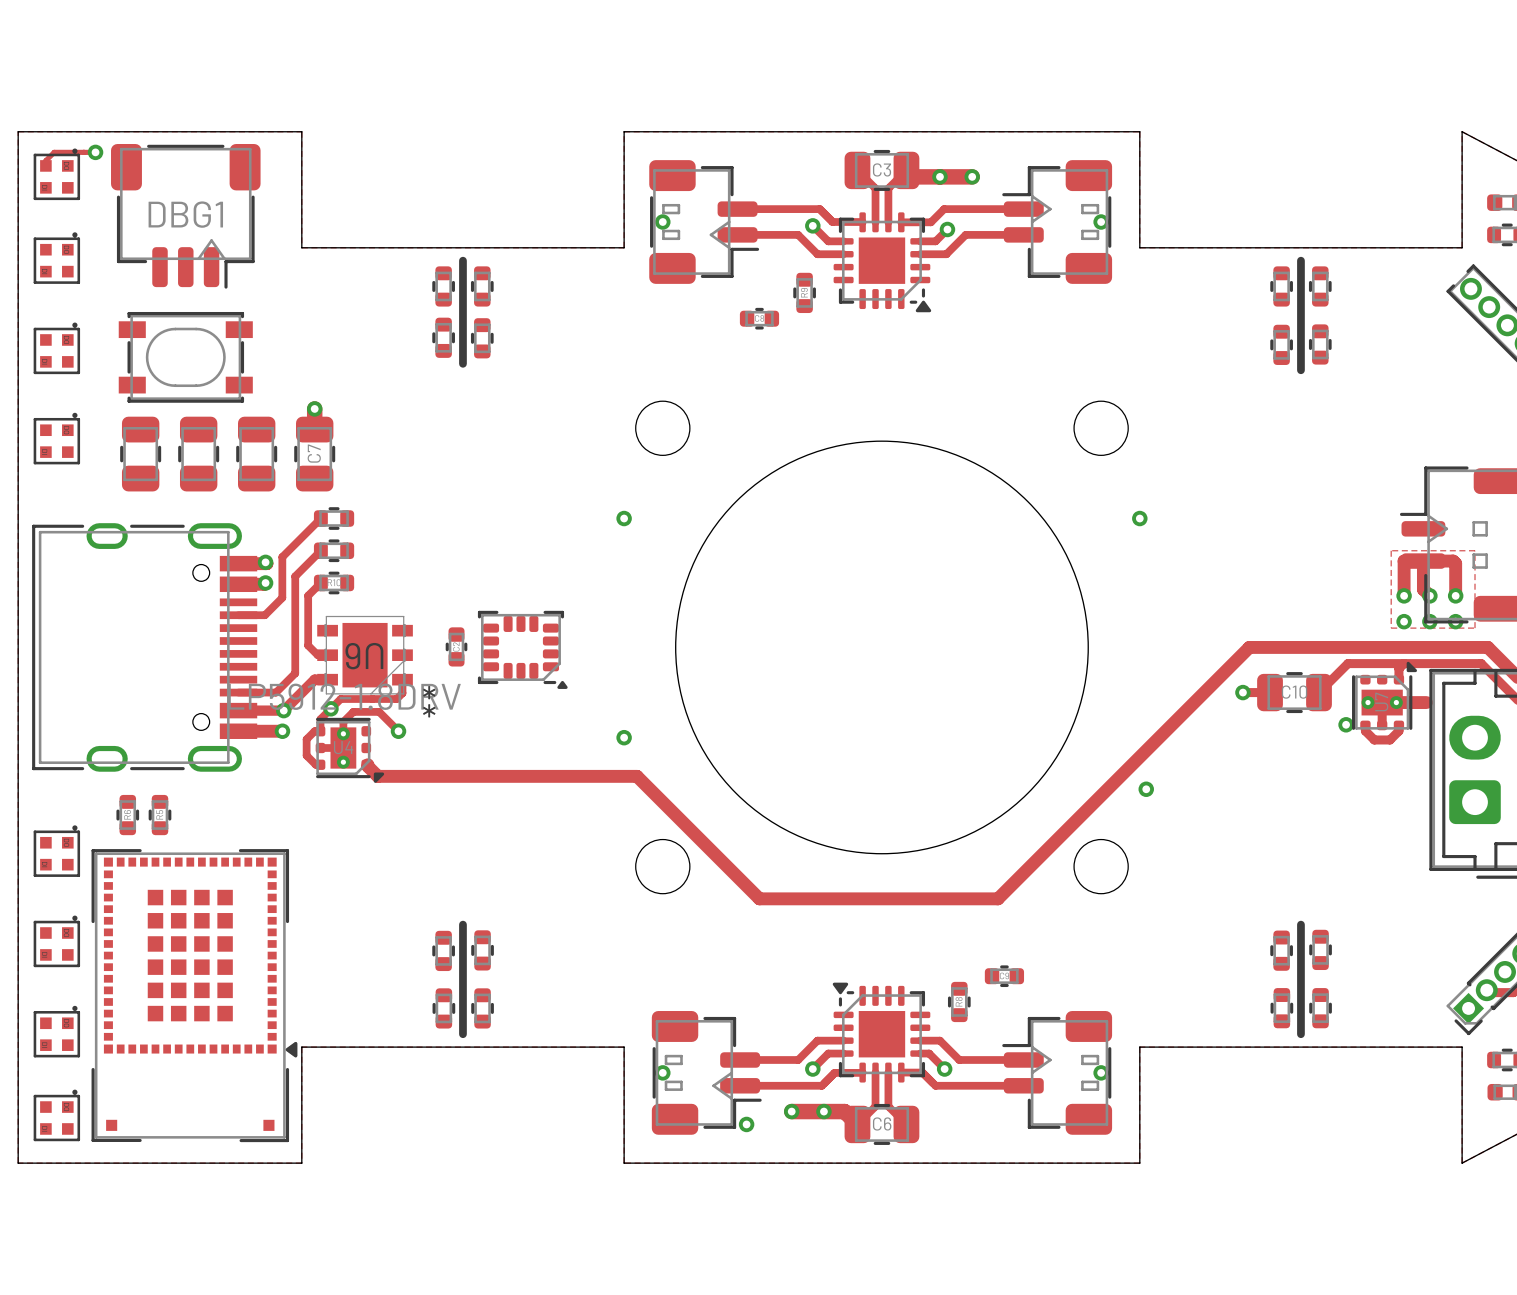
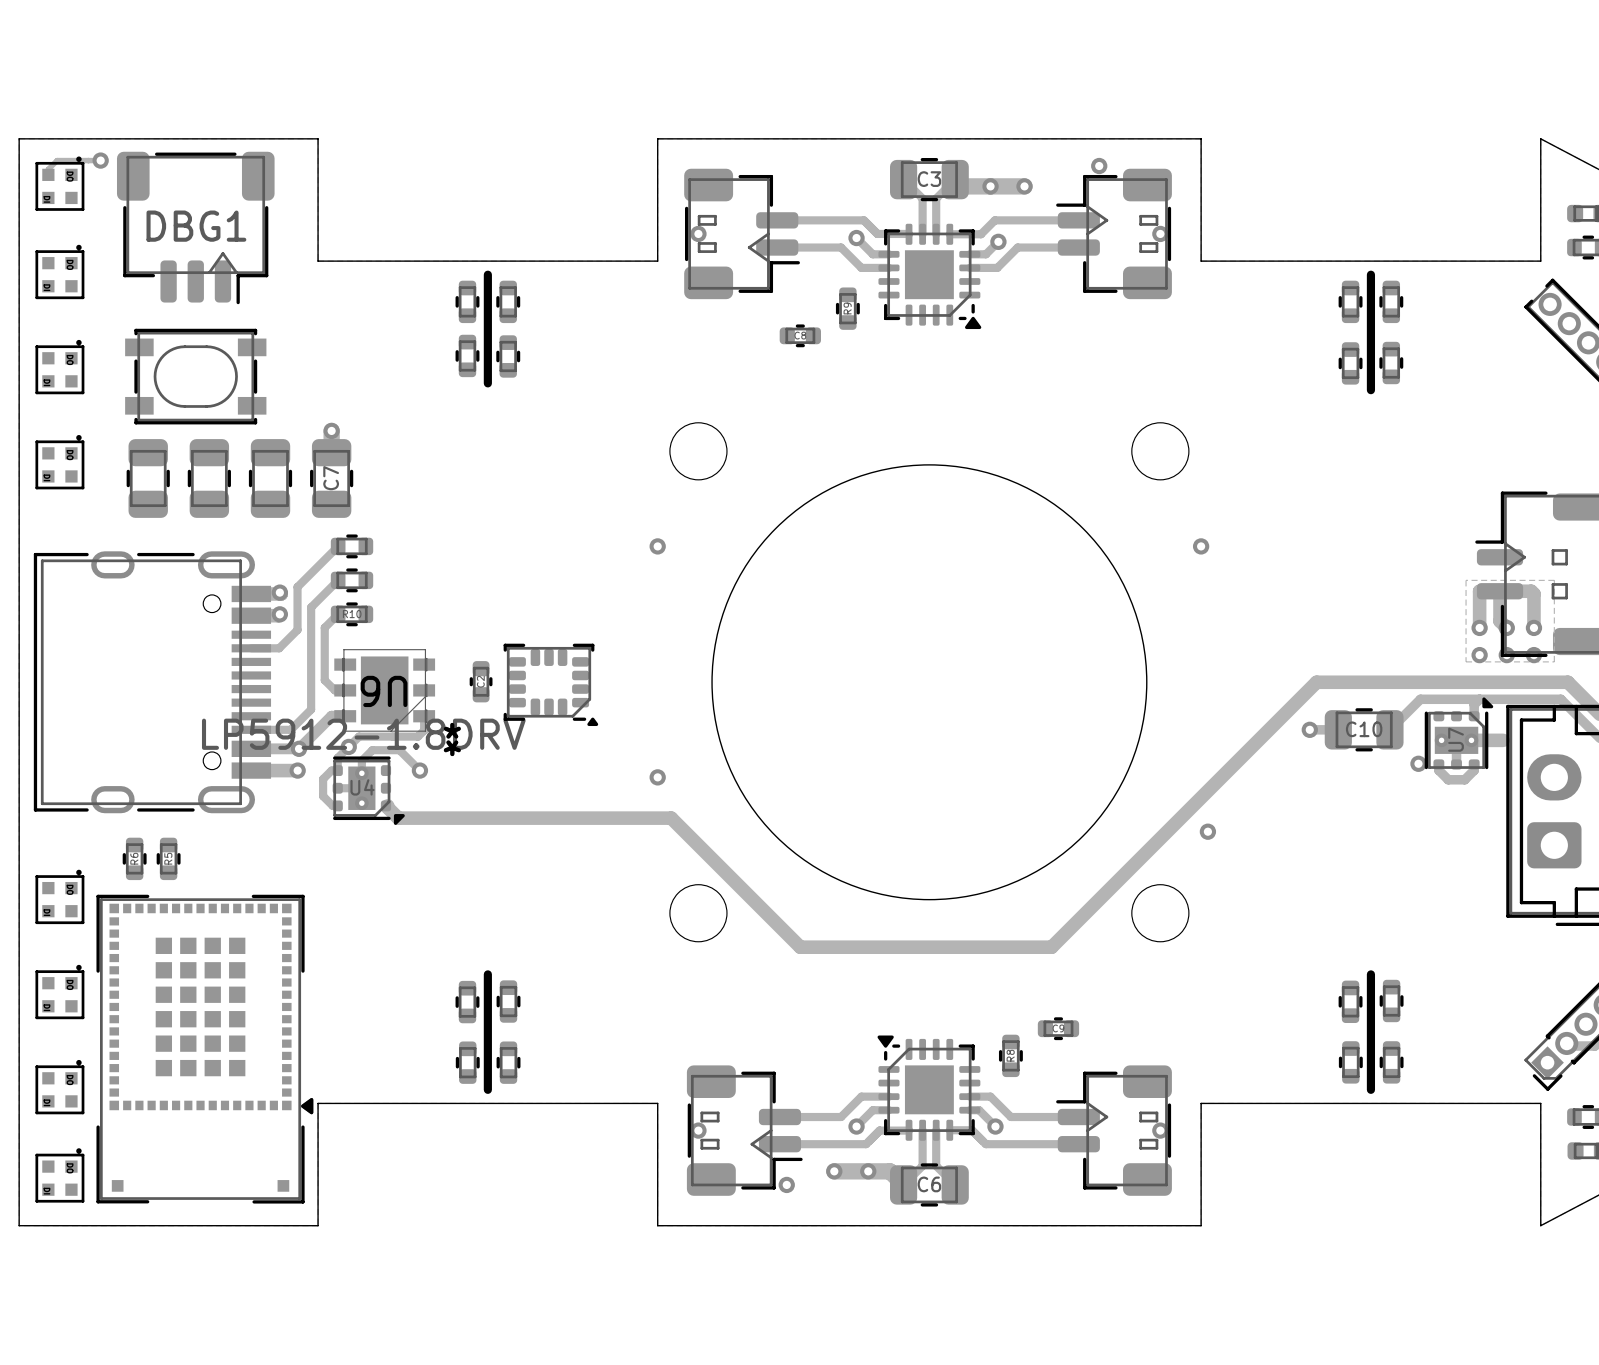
via: none -> (1099, 166)

